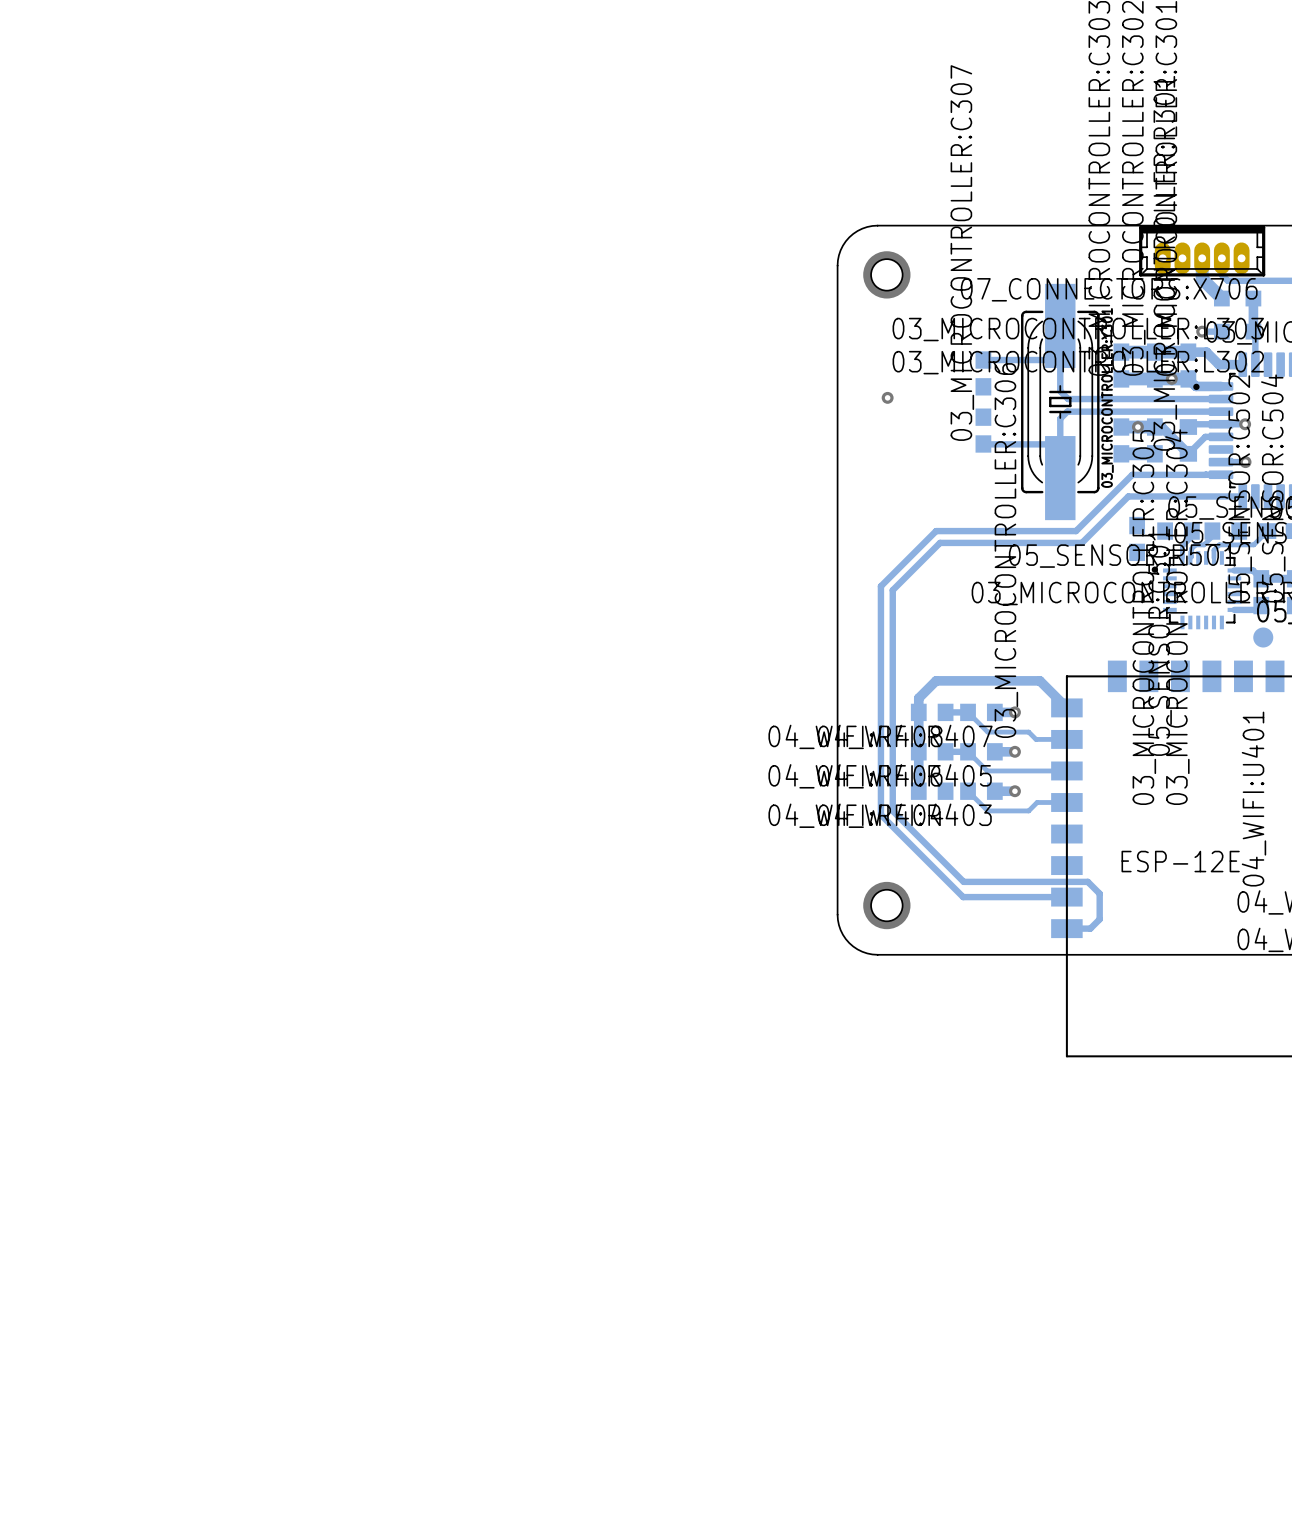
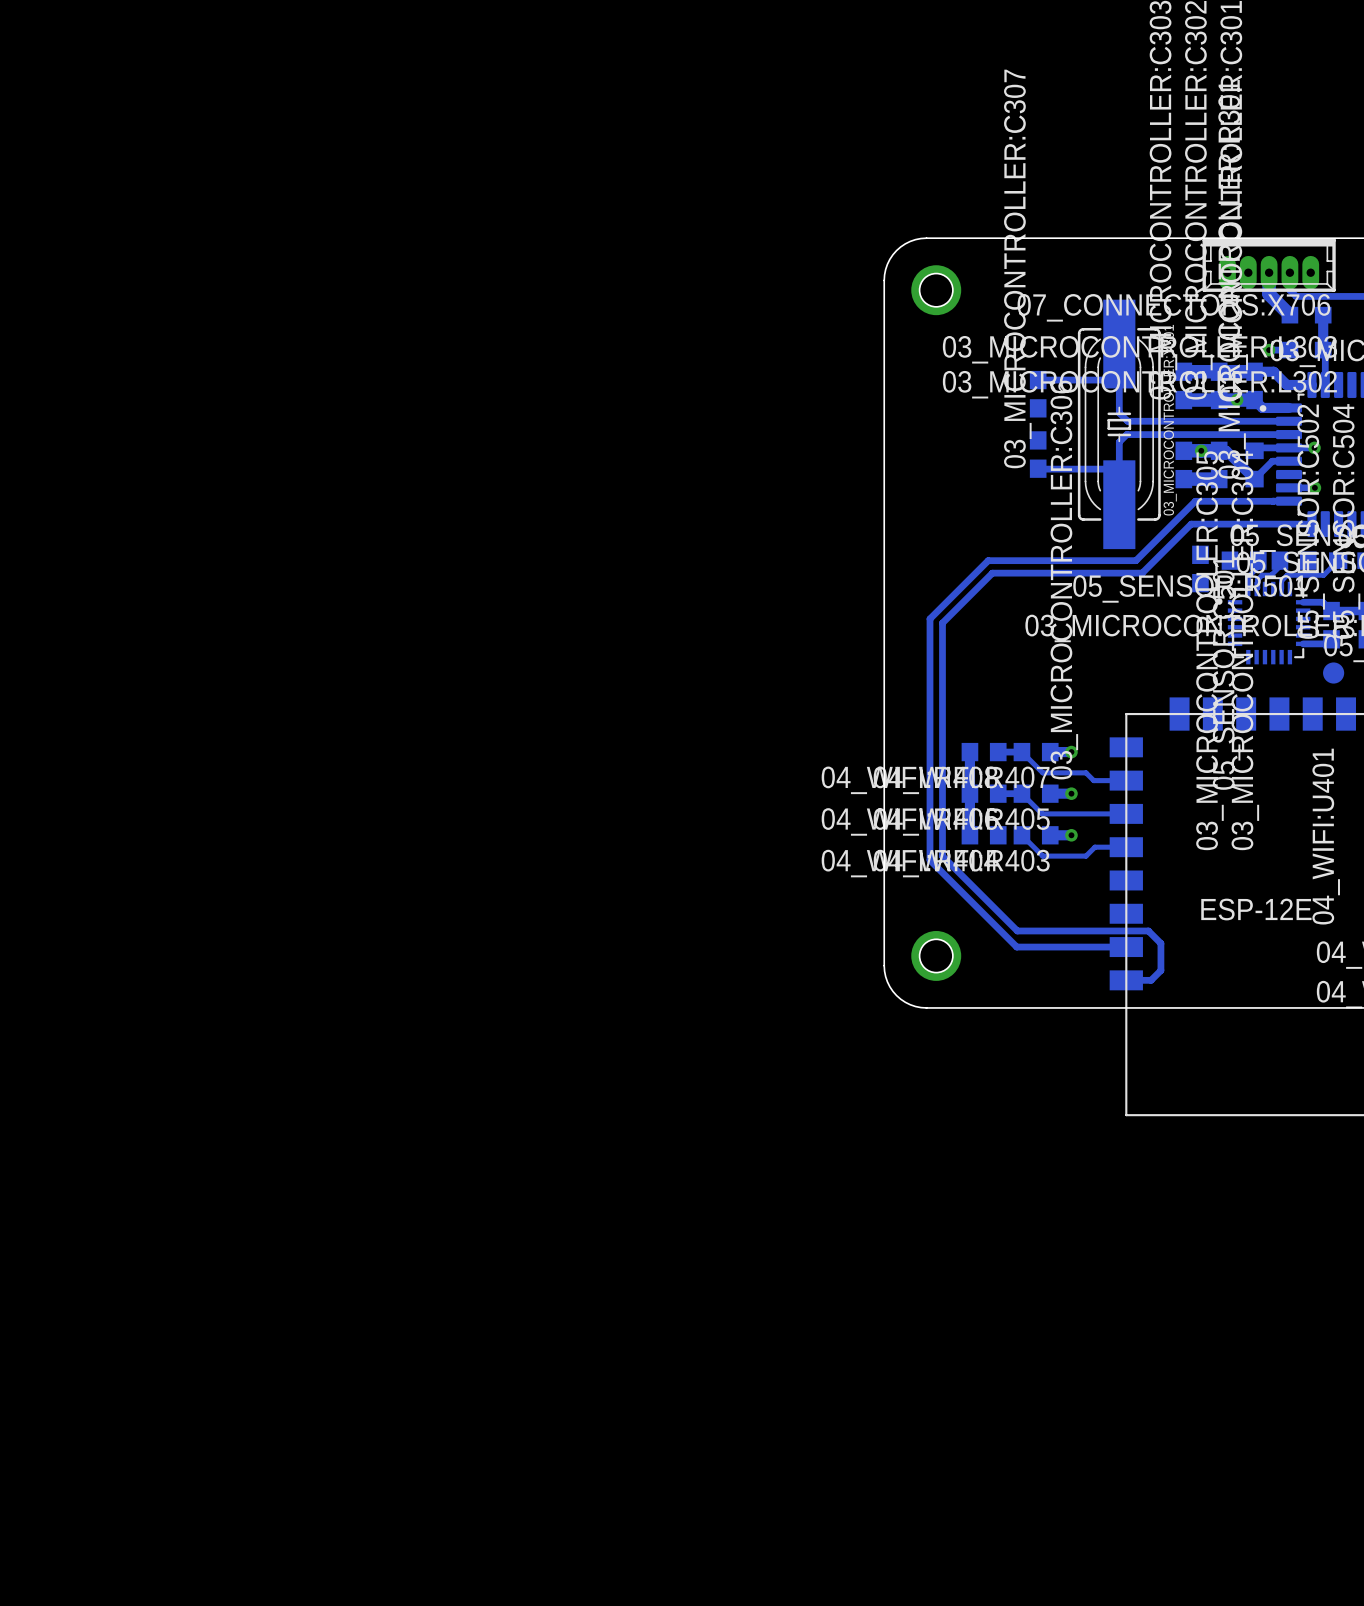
via: (887, 397) -> none
track: (1066, 707) (1039, 680) (936, 680) (918, 698) (918, 712) -> none

